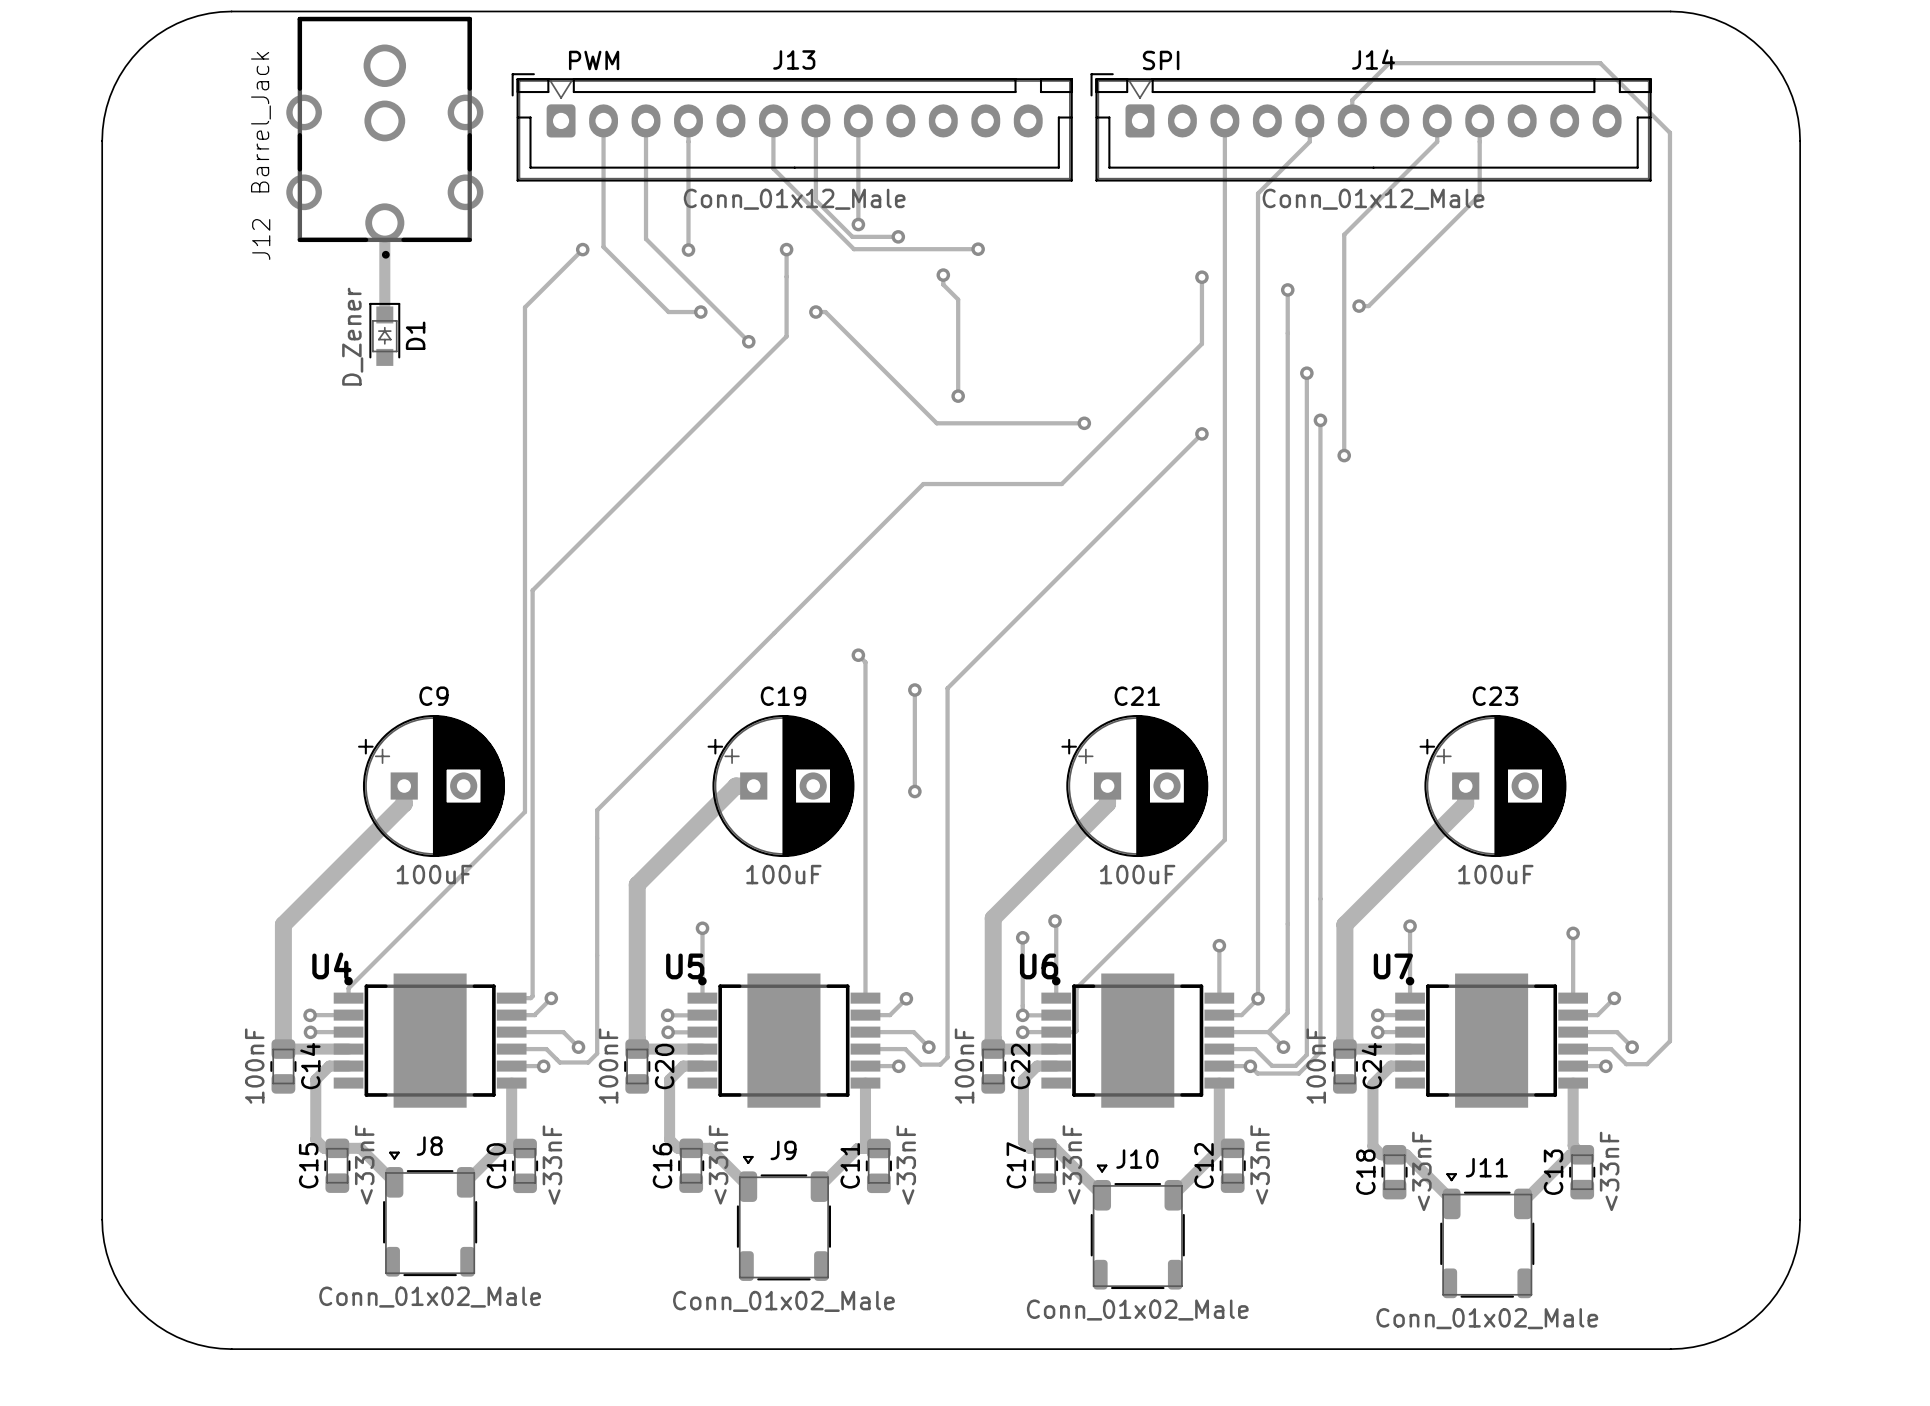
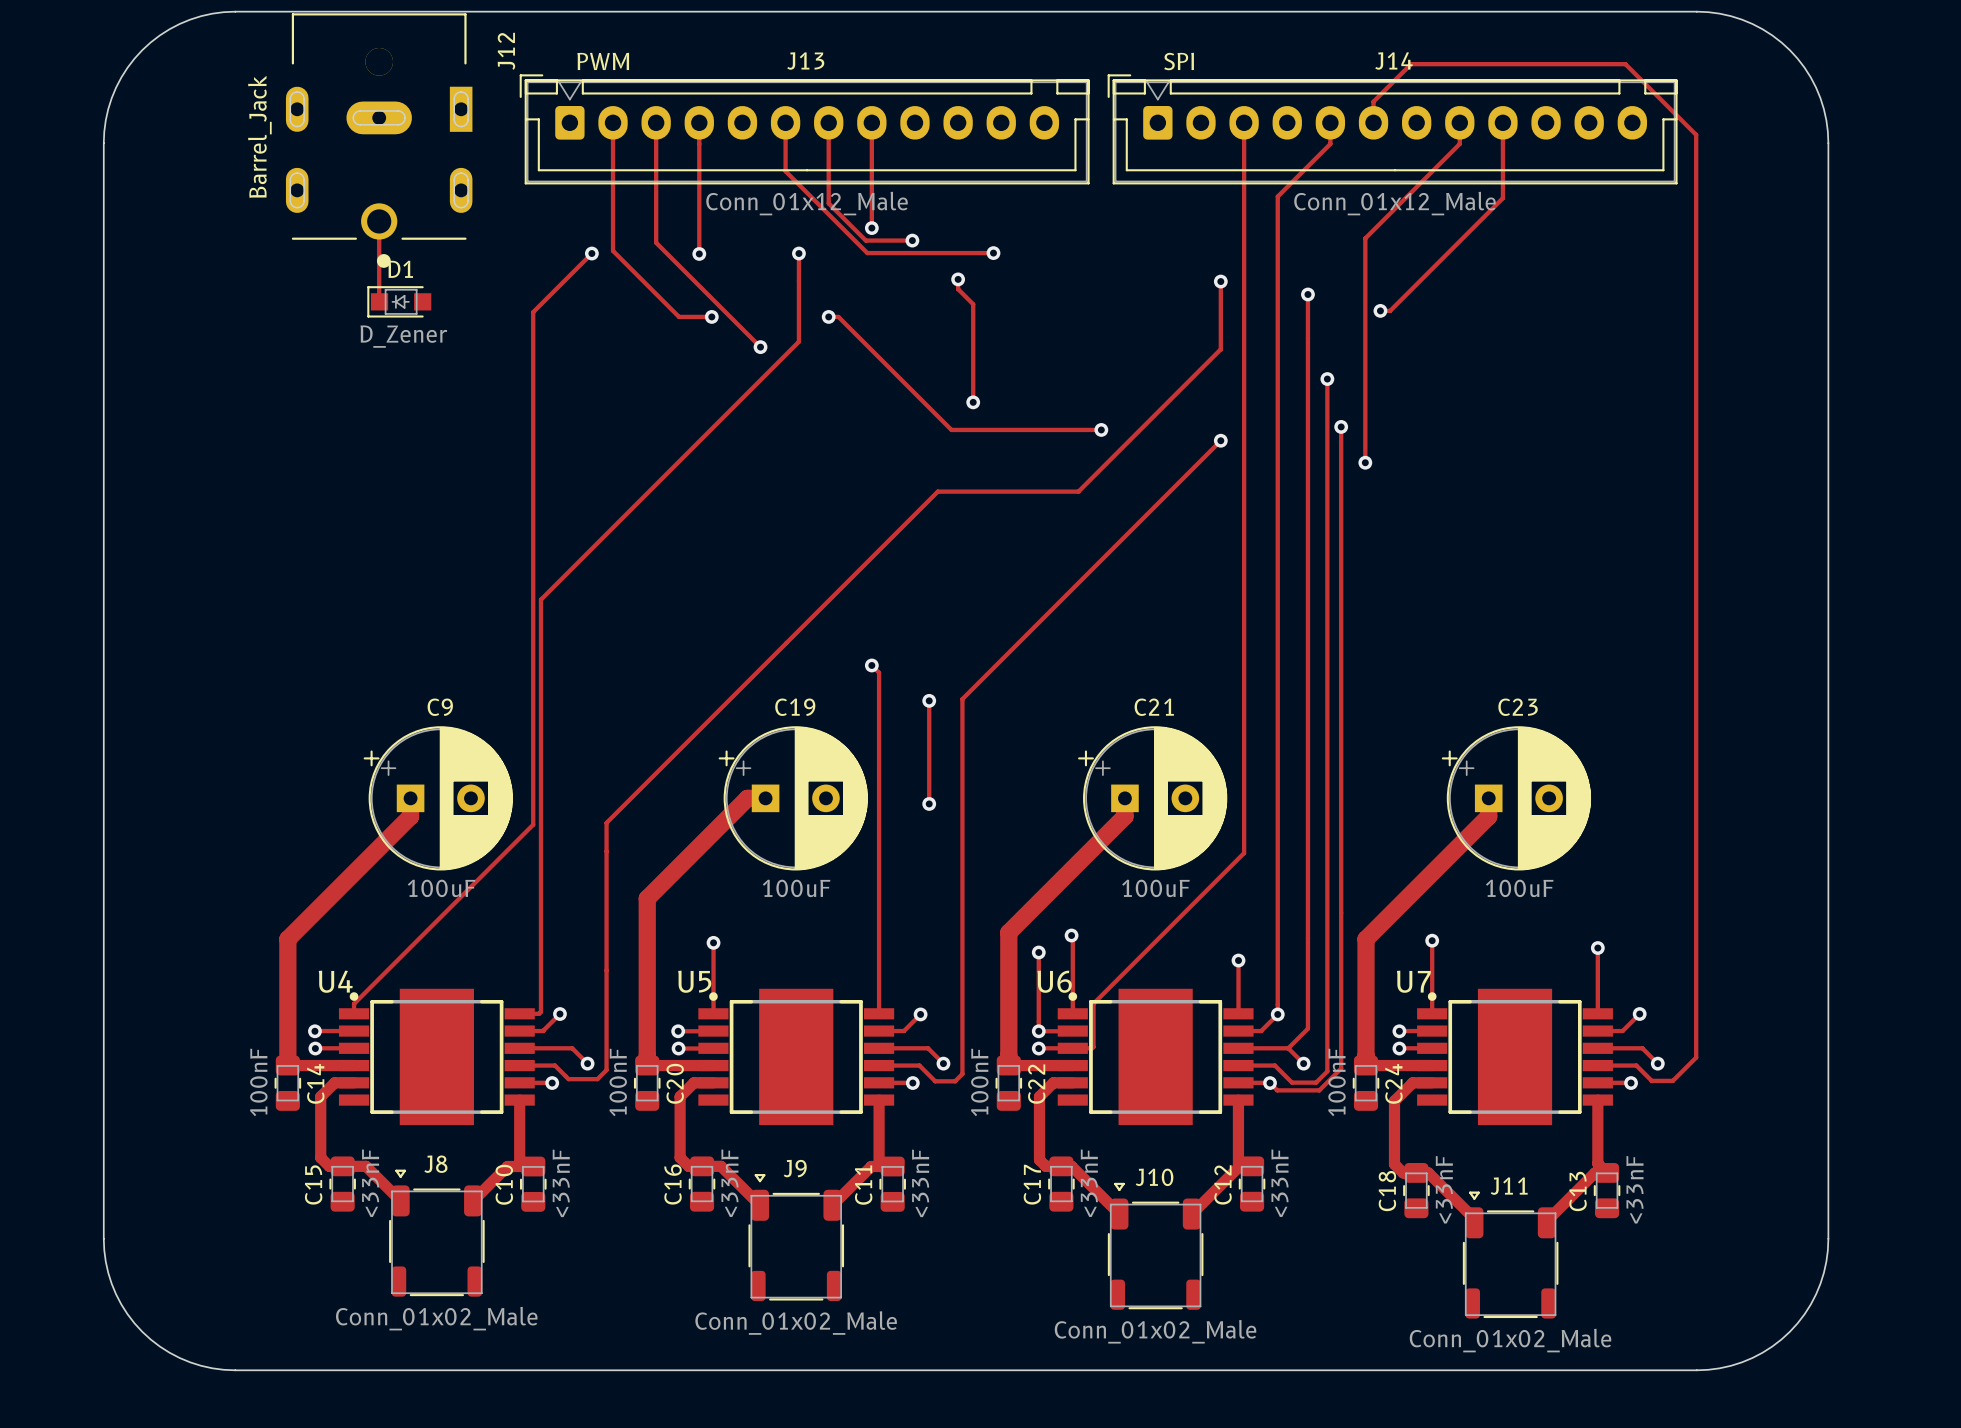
J12 footprint: [286, 16, 484, 259] -> [285, 13, 473, 268]
track: none -> (379, 221) (379, 301)
track: (384, 222) (384, 314) -> none
J12 name position: J12 (261, 239) -> J12 (506, 51)
D1 rotation: 0° (384, 334) -> 90° counterclockwise (399, 301)
D1 position: (384, 334) -> (399, 301)

